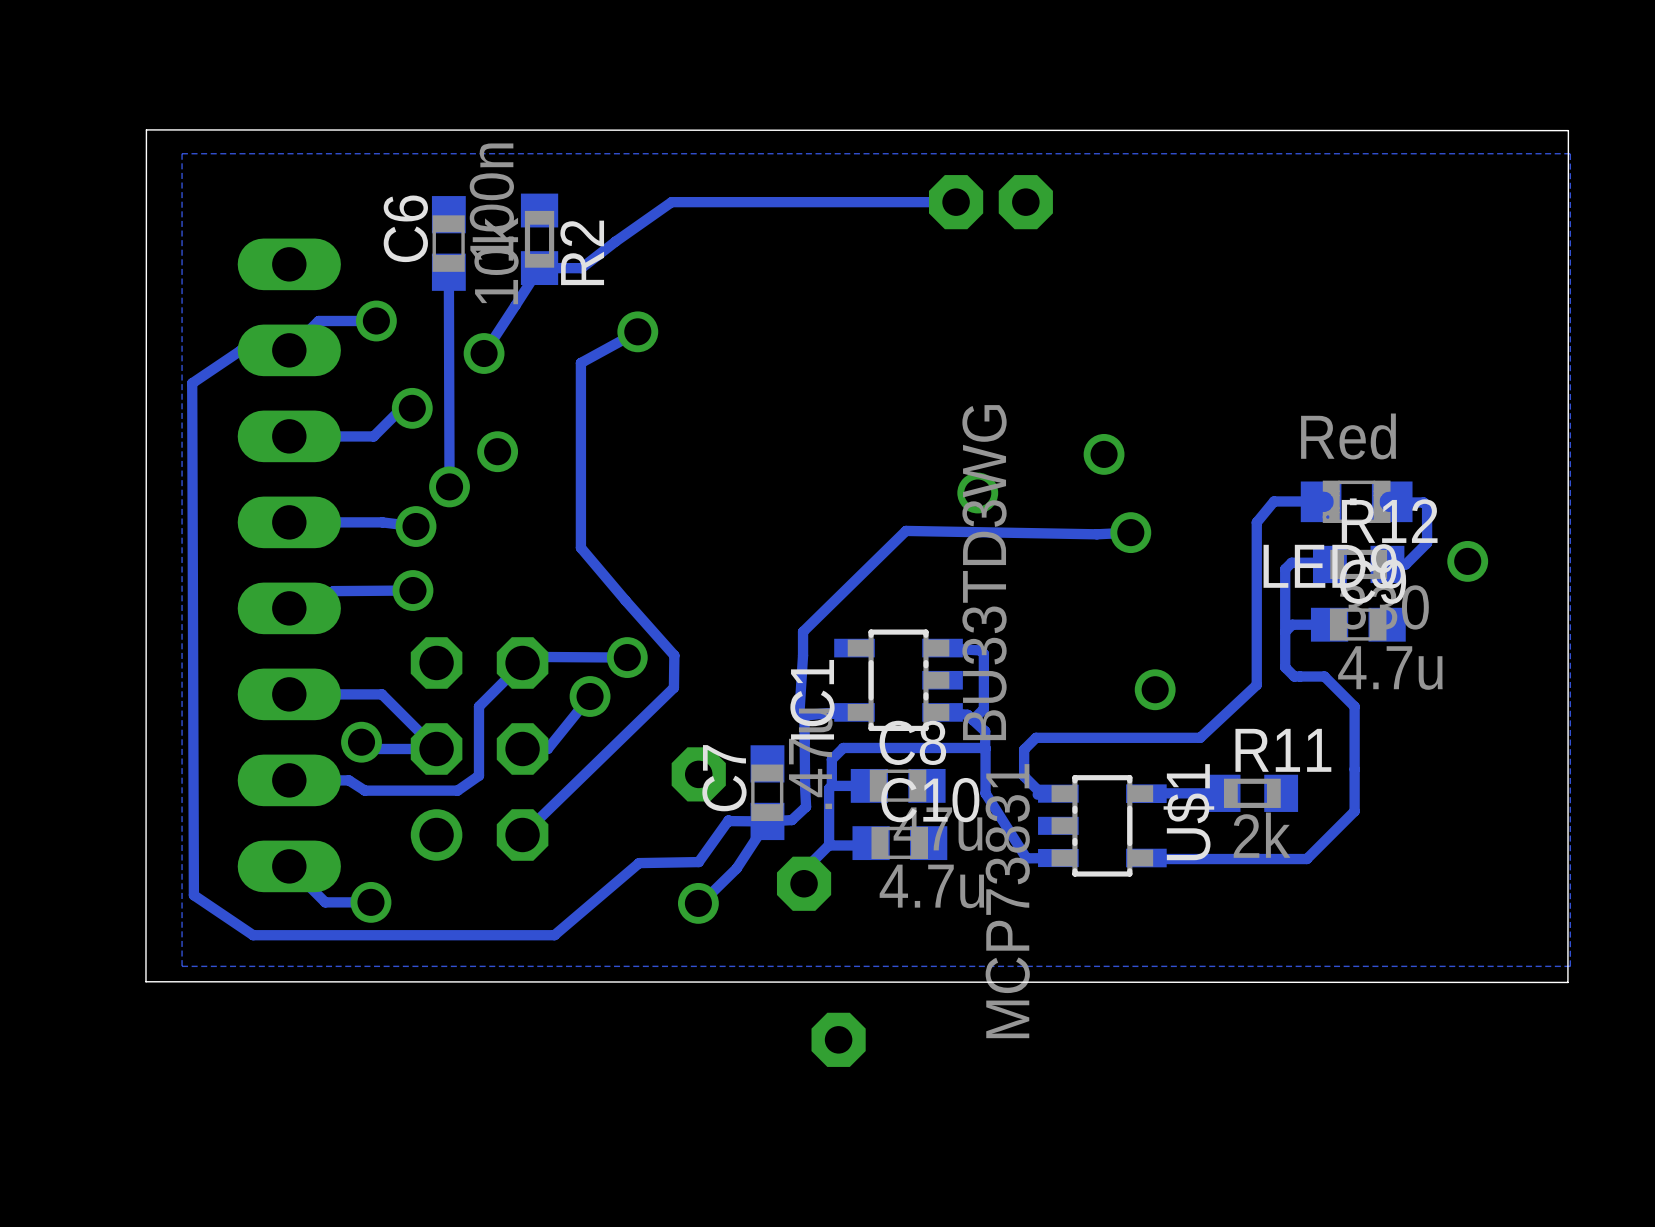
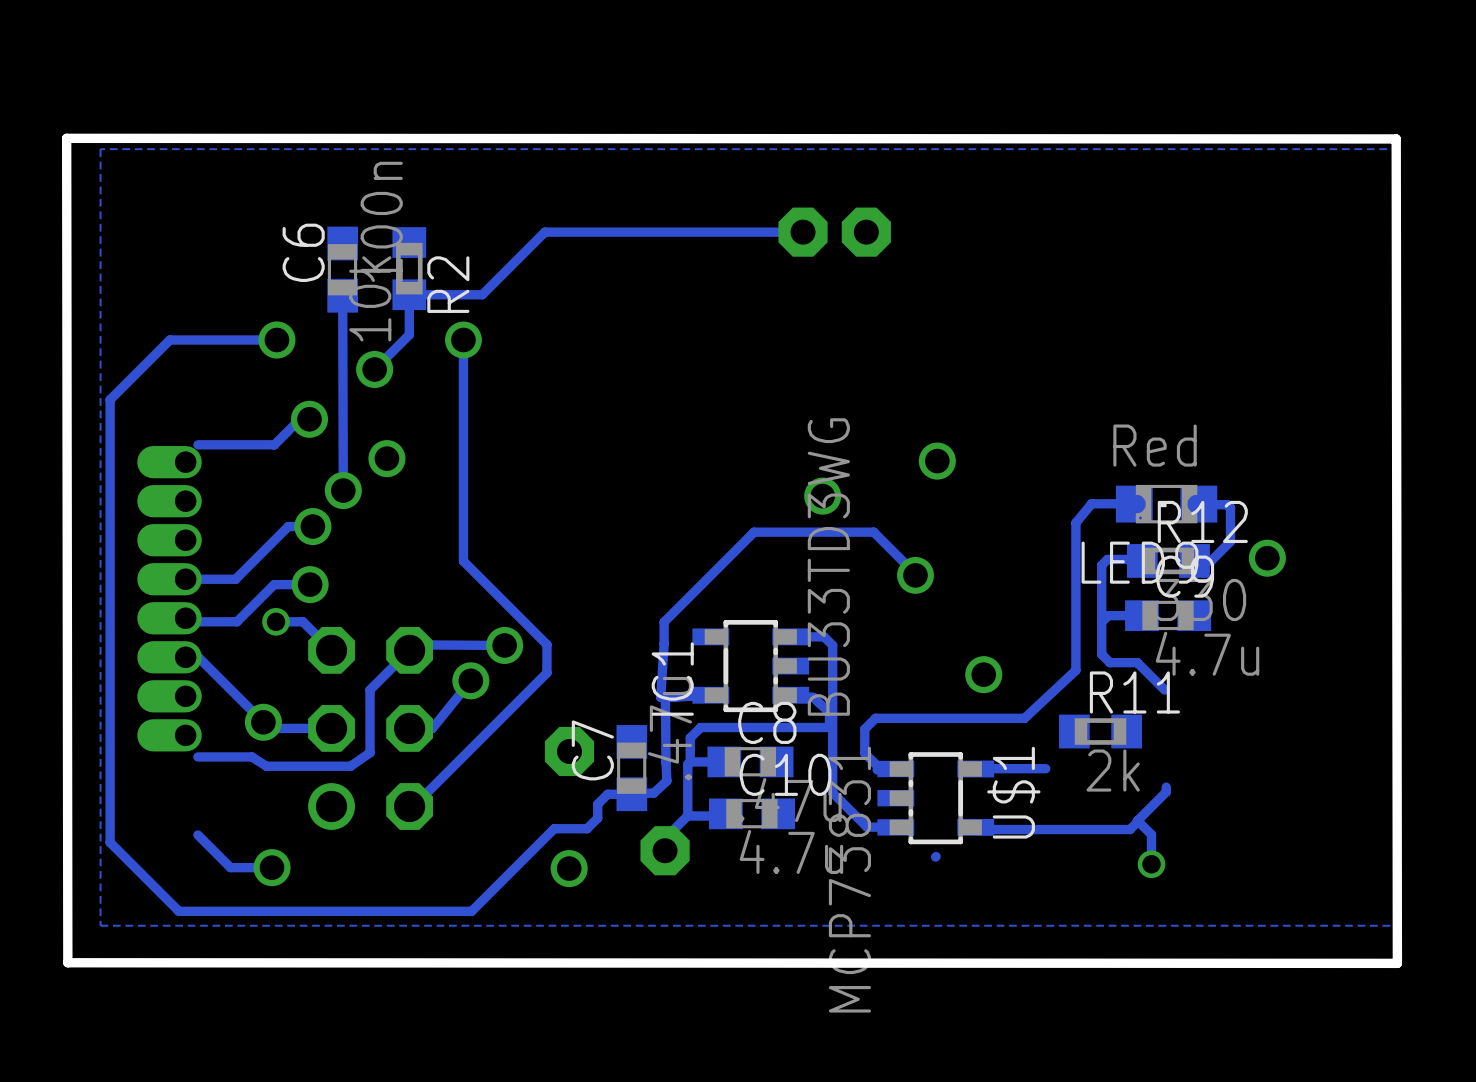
board edge: (146, 129) (145, 981) (1567, 982) (1568, 130) (146, 129) -> (66, 138) (1396, 138) (1397, 963) (67, 962) (66, 138)
zone outline: (182, 153) (1570, 153) (1570, 966) -> (100, 188) (100, 149) (1399, 149) (1399, 925) (1360, 925)
track: (671, 202) (581, 268) (539, 268) (484, 353) -> (544, 232) (482, 294) (409, 294) (409, 334) (374, 369)
R2 position: (539, 239) -> (409, 268)
track: (318, 320) (289, 350) (241, 350) (192, 383) (193, 895) (253, 935) (554, 935) (639, 863) (698, 862) (728, 820) (767, 821) (736, 868) (702, 902) (698, 903) -> (224, 340) (169, 340) (110, 399) (110, 842) (178, 911) (471, 911) (554, 828) (587, 828) (597, 818) (597, 804) (607, 794) (631, 794)
track: (637, 331) (580, 362) (580, 547) (674, 655) (673, 687) (522, 834) -> (462, 340) (463, 561) (546, 644) (546, 672) (413, 806) (409, 806)
via position: (637, 331) -> (463, 340)
track: (289, 522) (382, 522) (416, 526) -> (185, 579) (235, 579) (288, 526) (312, 526)
via position: (1130, 532) -> (915, 575)
track: (1127, 534) (1130, 532) (1096, 534) (905, 530) (803, 631) -> (915, 575) (873, 532) (754, 532) (664, 622)
part: (289, 565) -> none
track: (412, 590) (333, 591) (289, 608) -> (310, 584) (274, 584) (236, 621) (189, 621) (185, 618)
part: none -> (169, 598)
track: none -> (276, 621) (302, 621) (331, 650)
via: none -> (276, 621)
track: (942, 648) (980, 650) (983, 653) (983, 709) (972, 720) -> none
track: none -> (185, 657) (198, 657) (263, 722)
track: (289, 694) (381, 694) (436, 748) -> none
track: (1354, 706) (1354, 811) (1306, 859) (1147, 859) -> (1137, 820) (1130, 829) (976, 828)
track: (984, 747) (985, 793) (1026, 858) (1058, 858) -> (790, 636) (824, 636) (832, 645) (832, 792) (867, 827) (895, 827)
R11 position: (1252, 793) -> (1100, 731)
track: none -> (1166, 787) (1166, 792) (1137, 820)
track: none -> (1137, 820) (1151, 834) (1151, 864)
track: none -> (936, 856) (935, 857)
via: none -> (1151, 864)
part: (838, 1039) -> none

